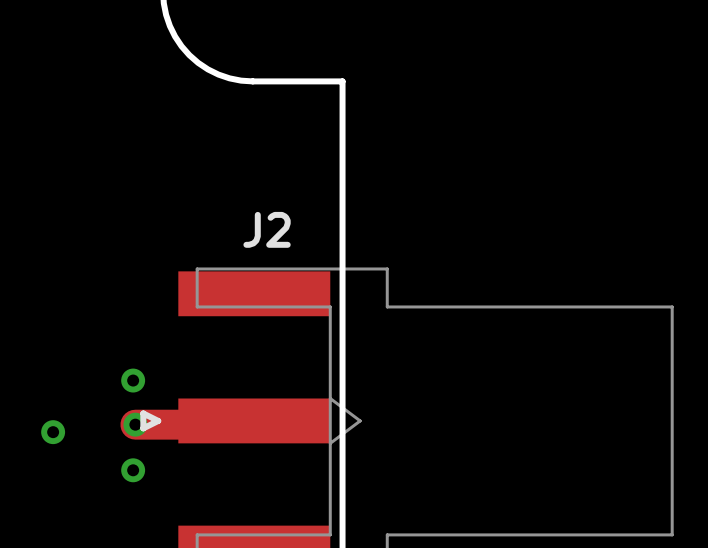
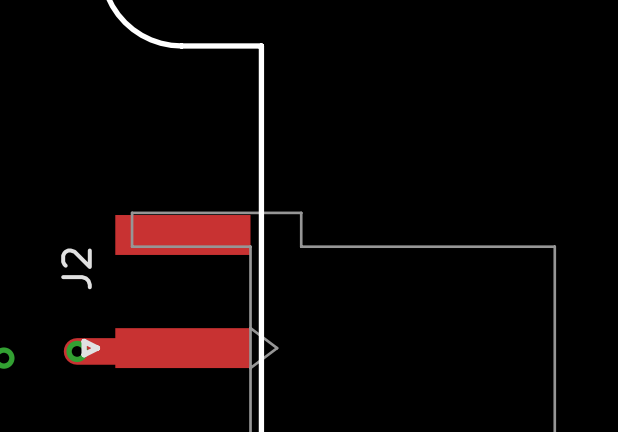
J2 name rotation: 0° (267, 229) -> 90° counterclockwise (76, 268)
J2 name position: J2 (267, 229) -> J2 (76, 268)
via: (133, 380) -> none
via: (133, 470) -> none

